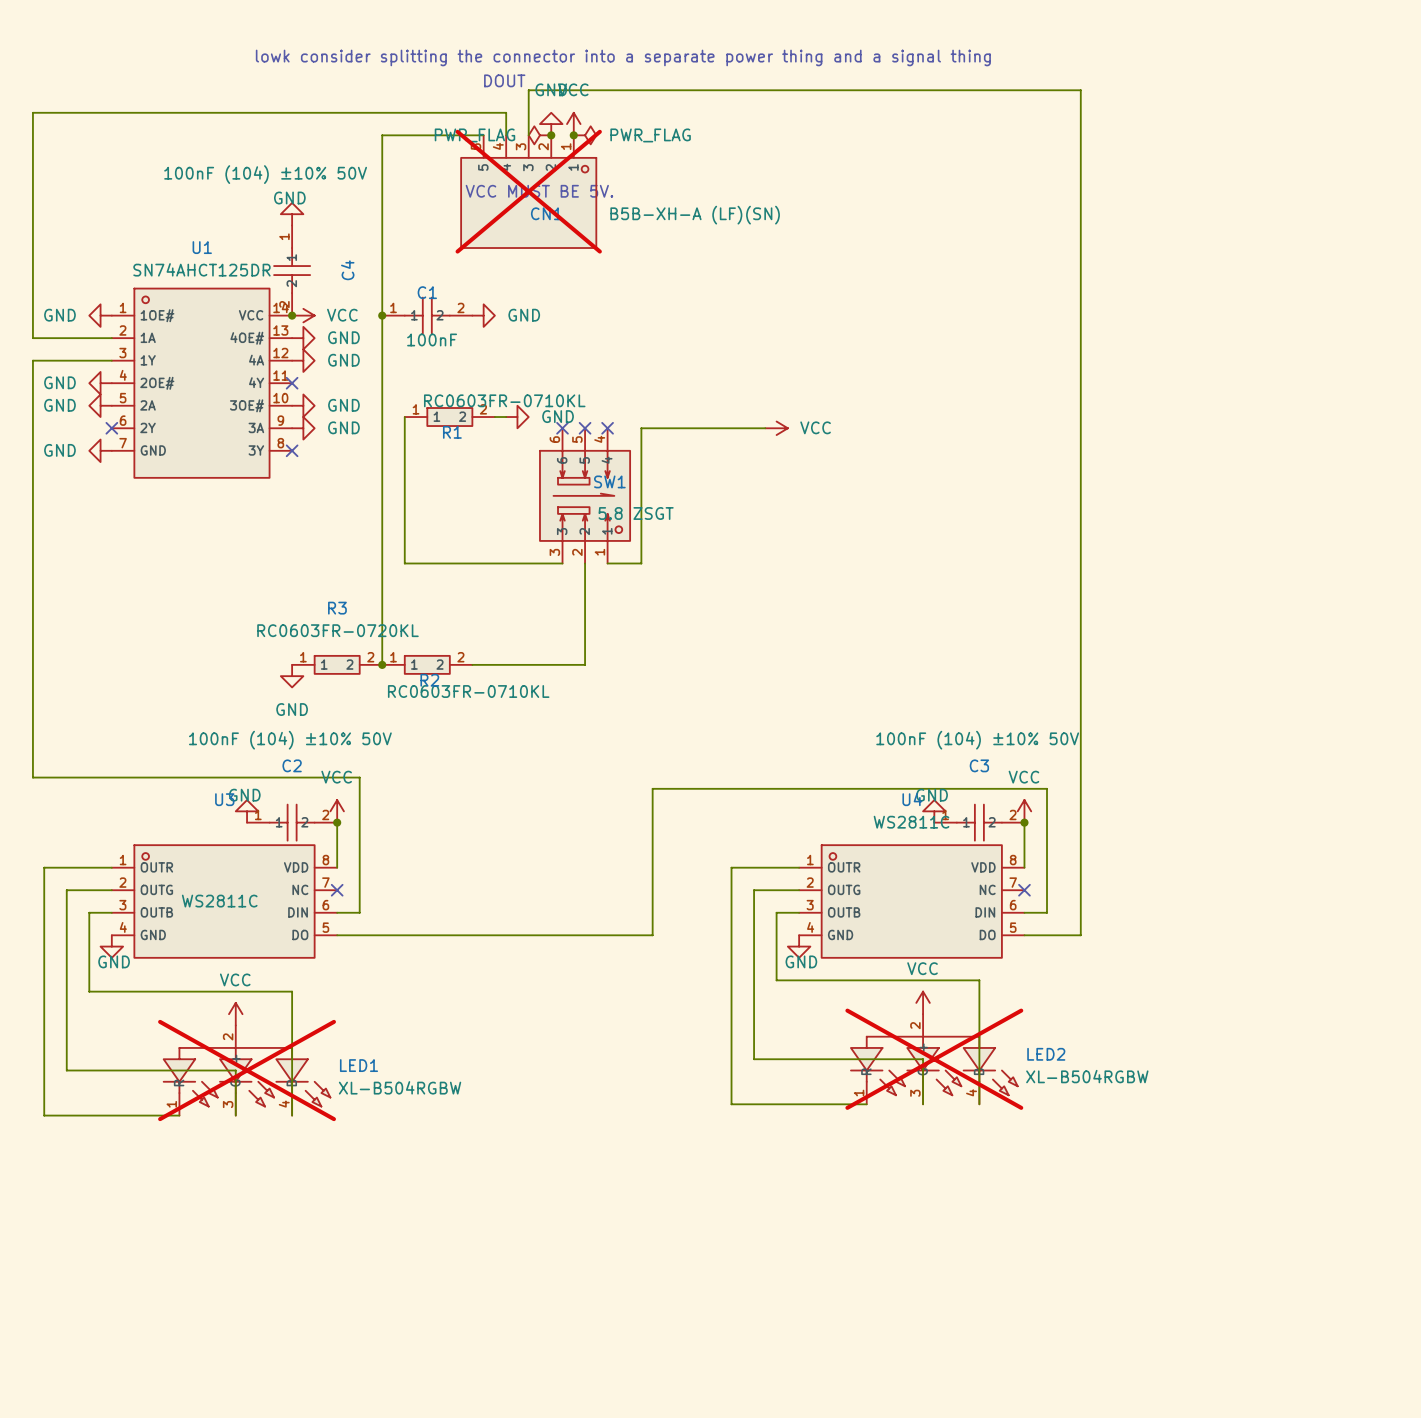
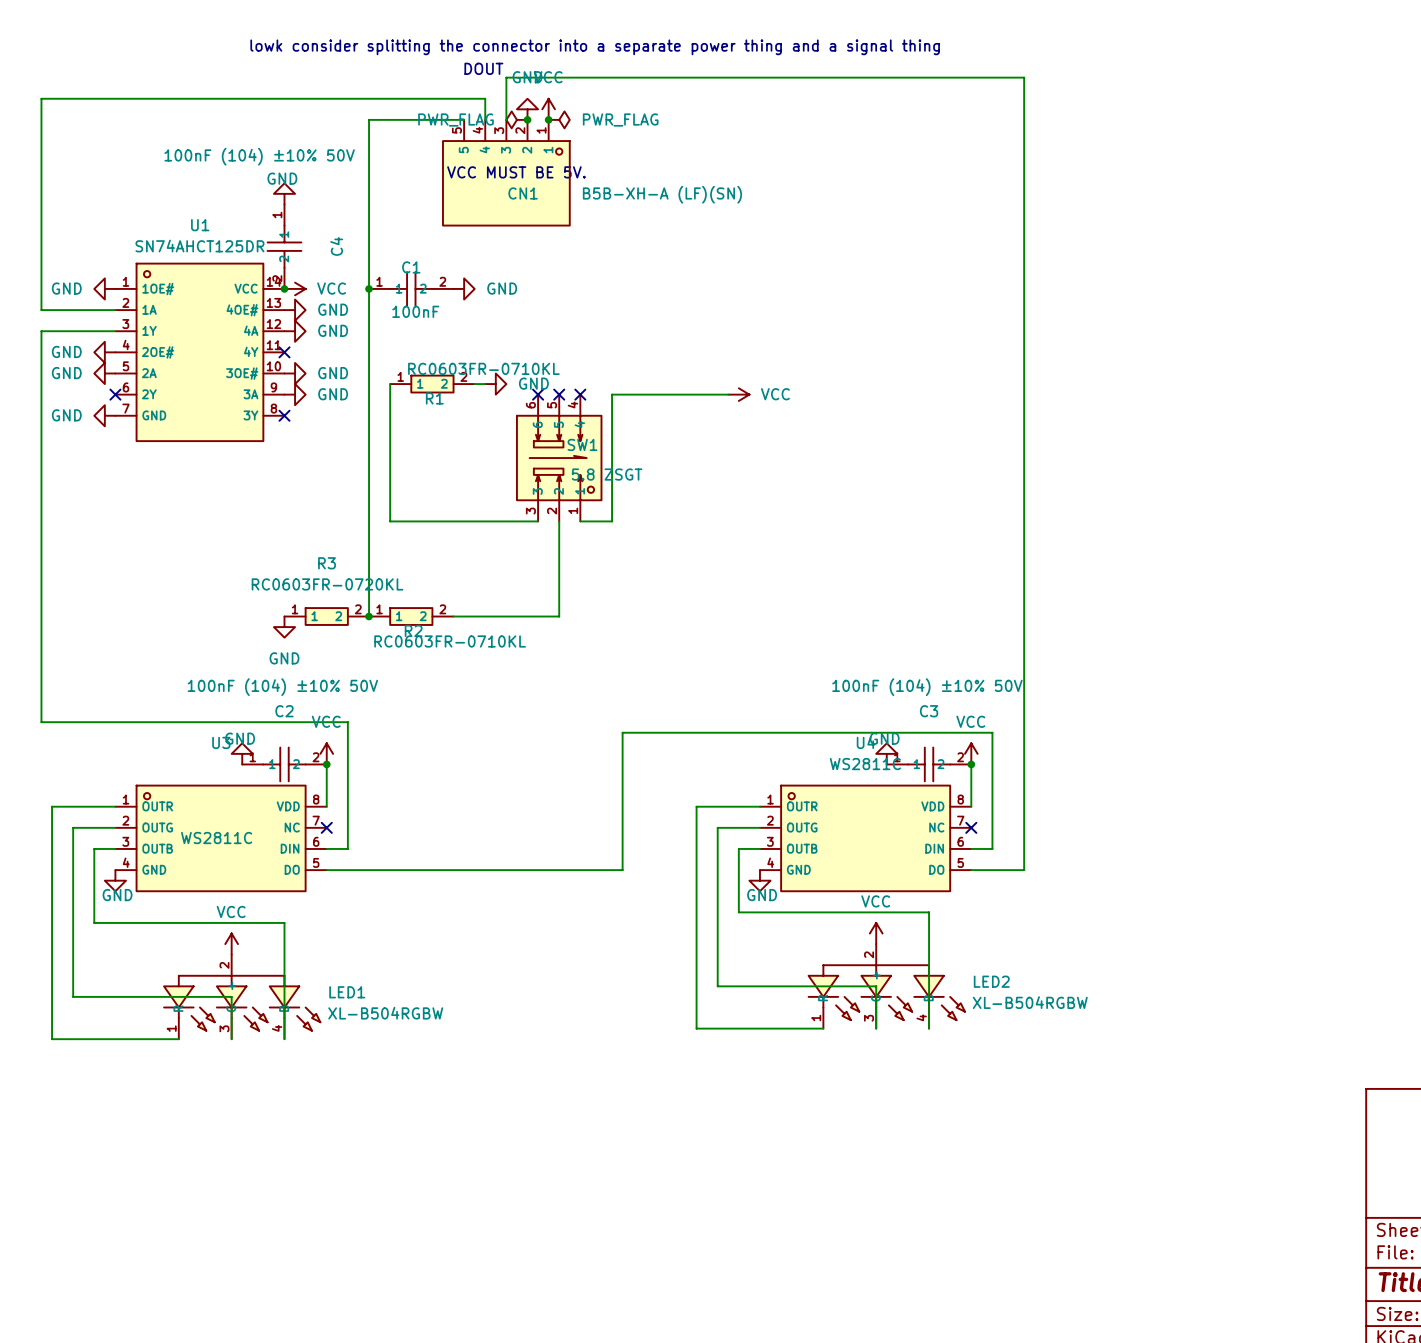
CN1 do-not-place cross: (528, 191) -> none
LED2 do-not-place cross: (934, 1059) -> none
LED1 do-not-place cross: (247, 1070) -> none

